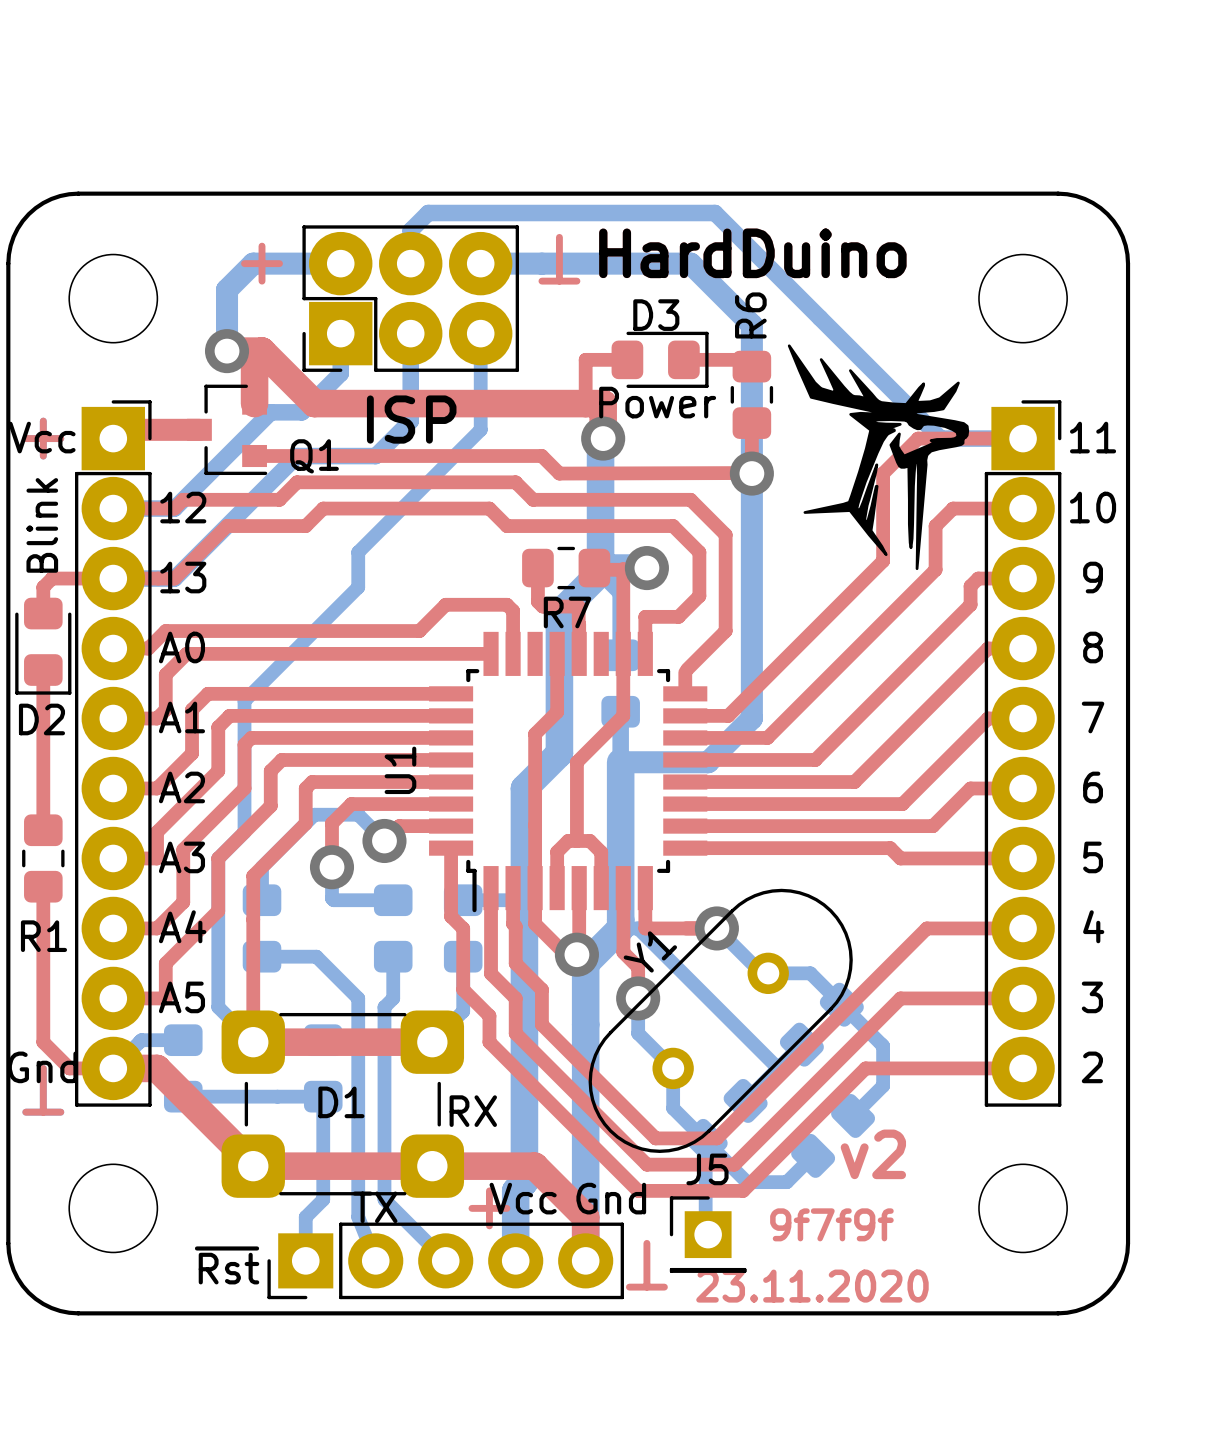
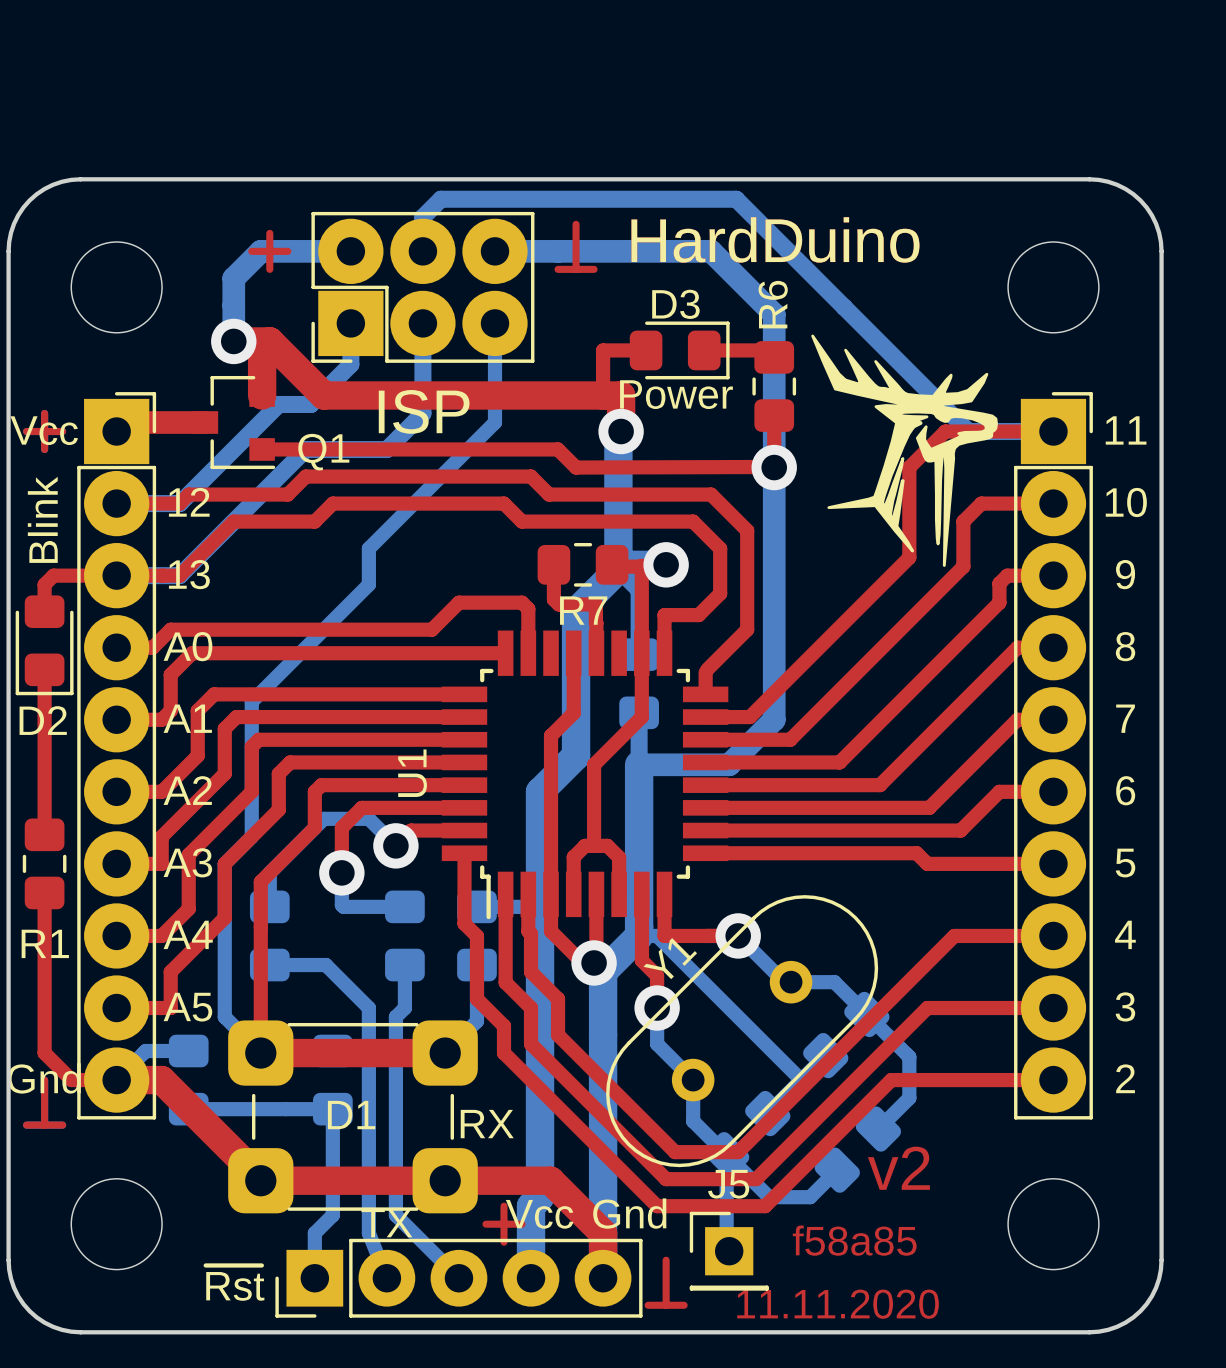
text: 9f7f9f (831, 1224) -> f58a85 (854, 1240)
text: 23.11.2020 (812, 1286) -> 11.11.2020 (838, 1304)

